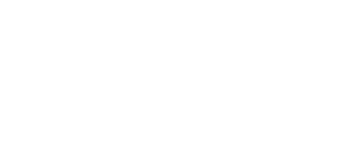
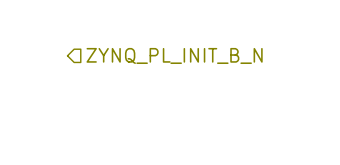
hierarchical label: none -> ZYNQ_PL_INIT_B_N (174, 55)

